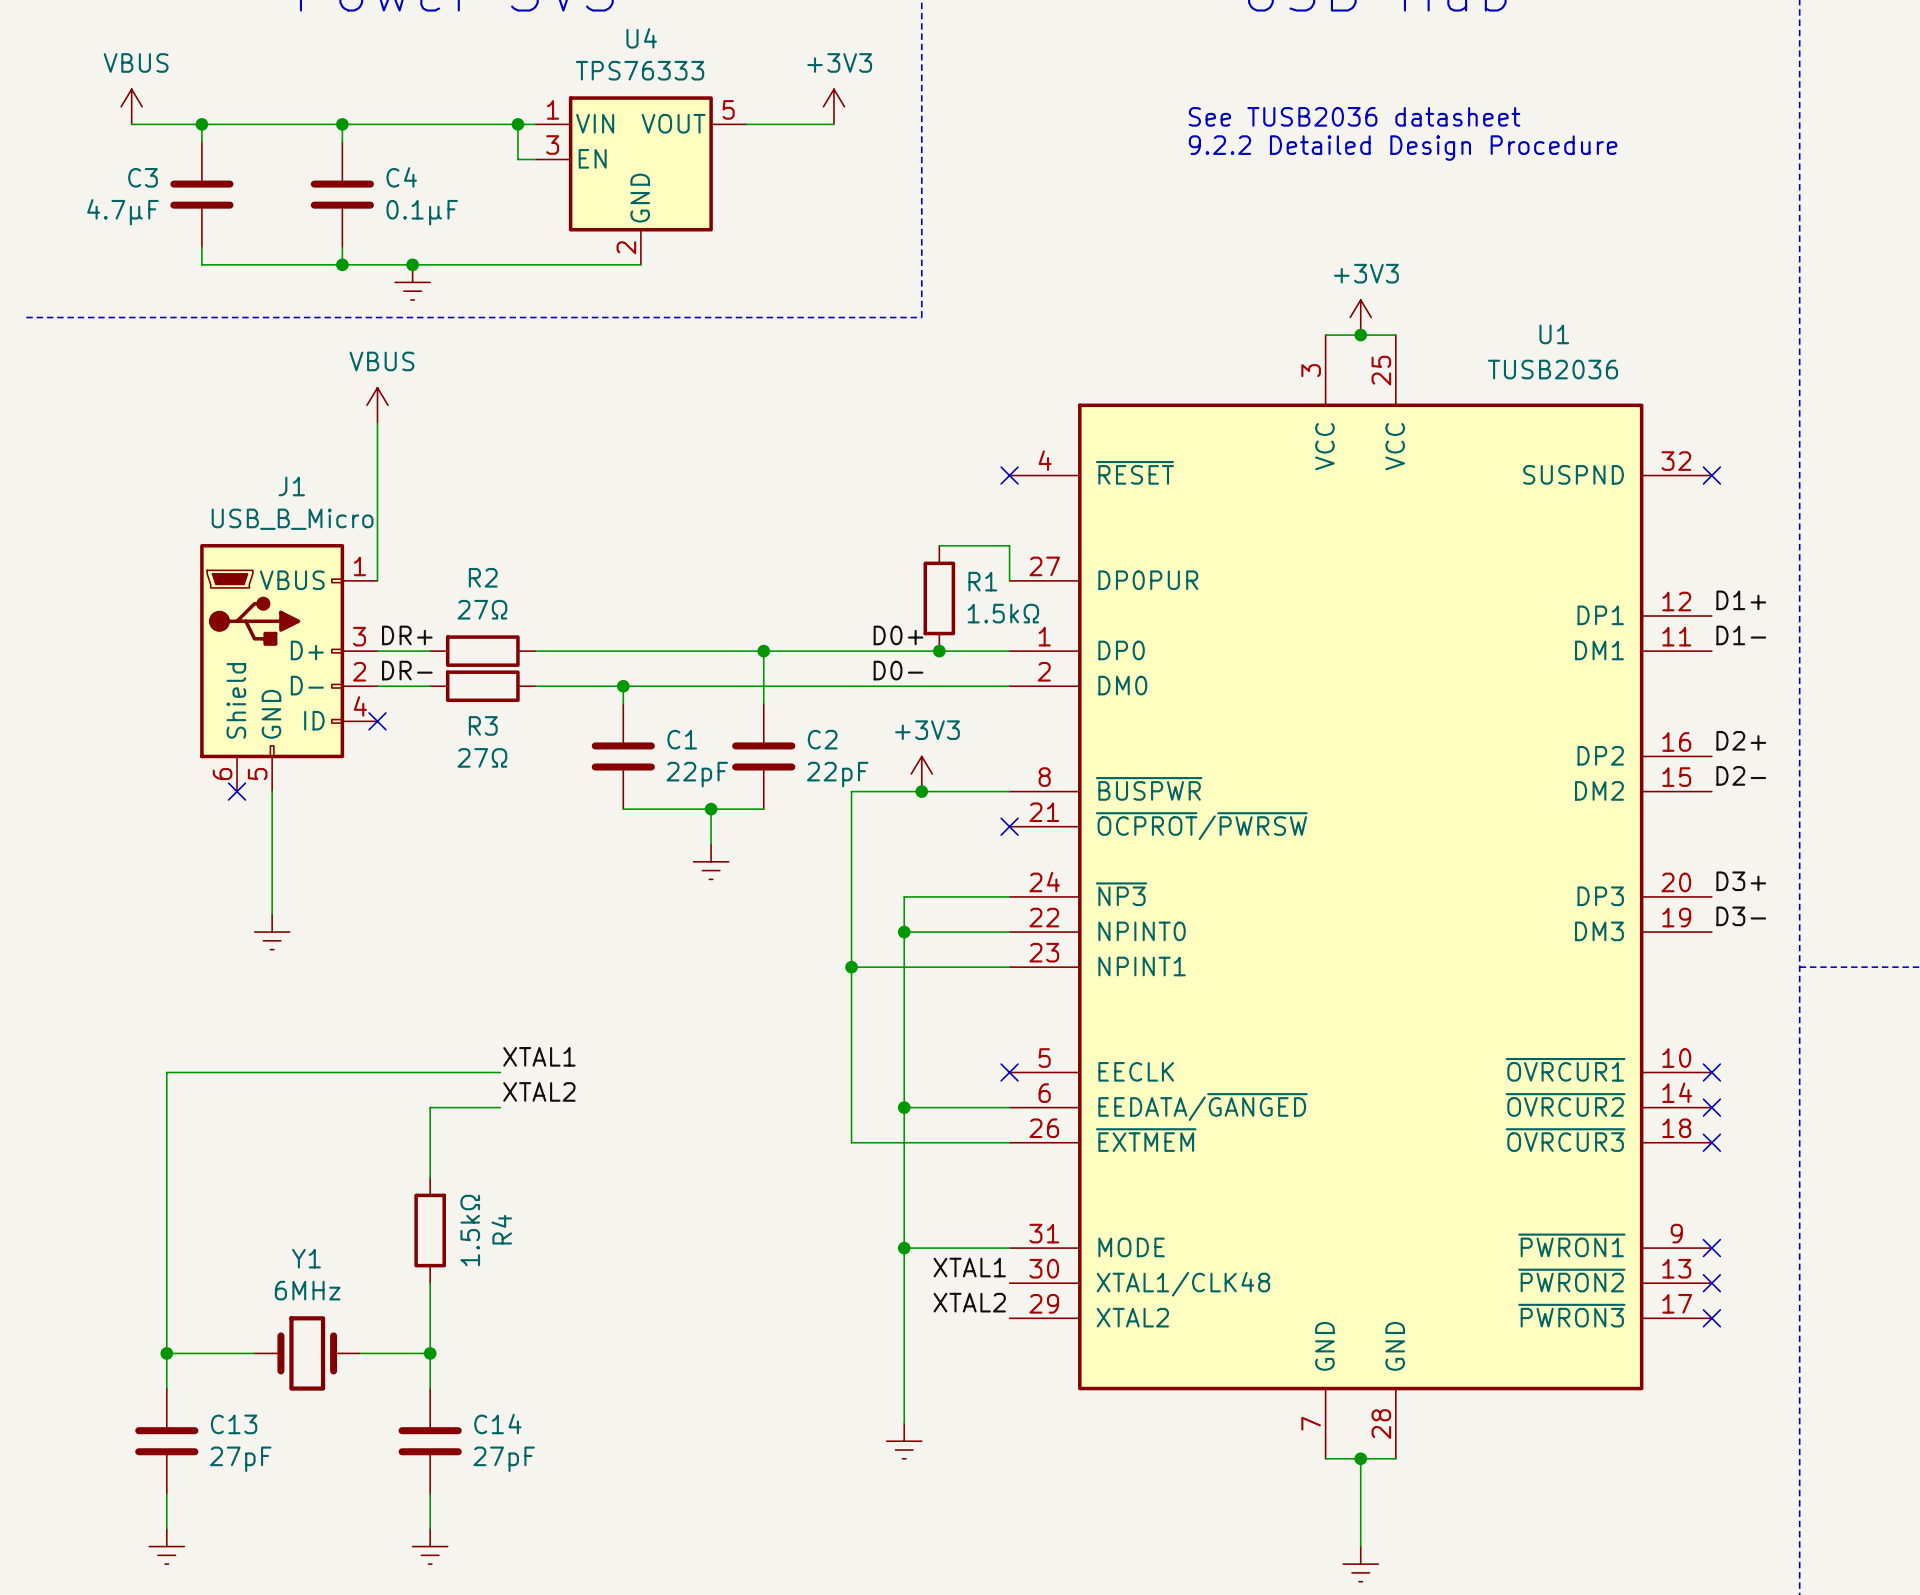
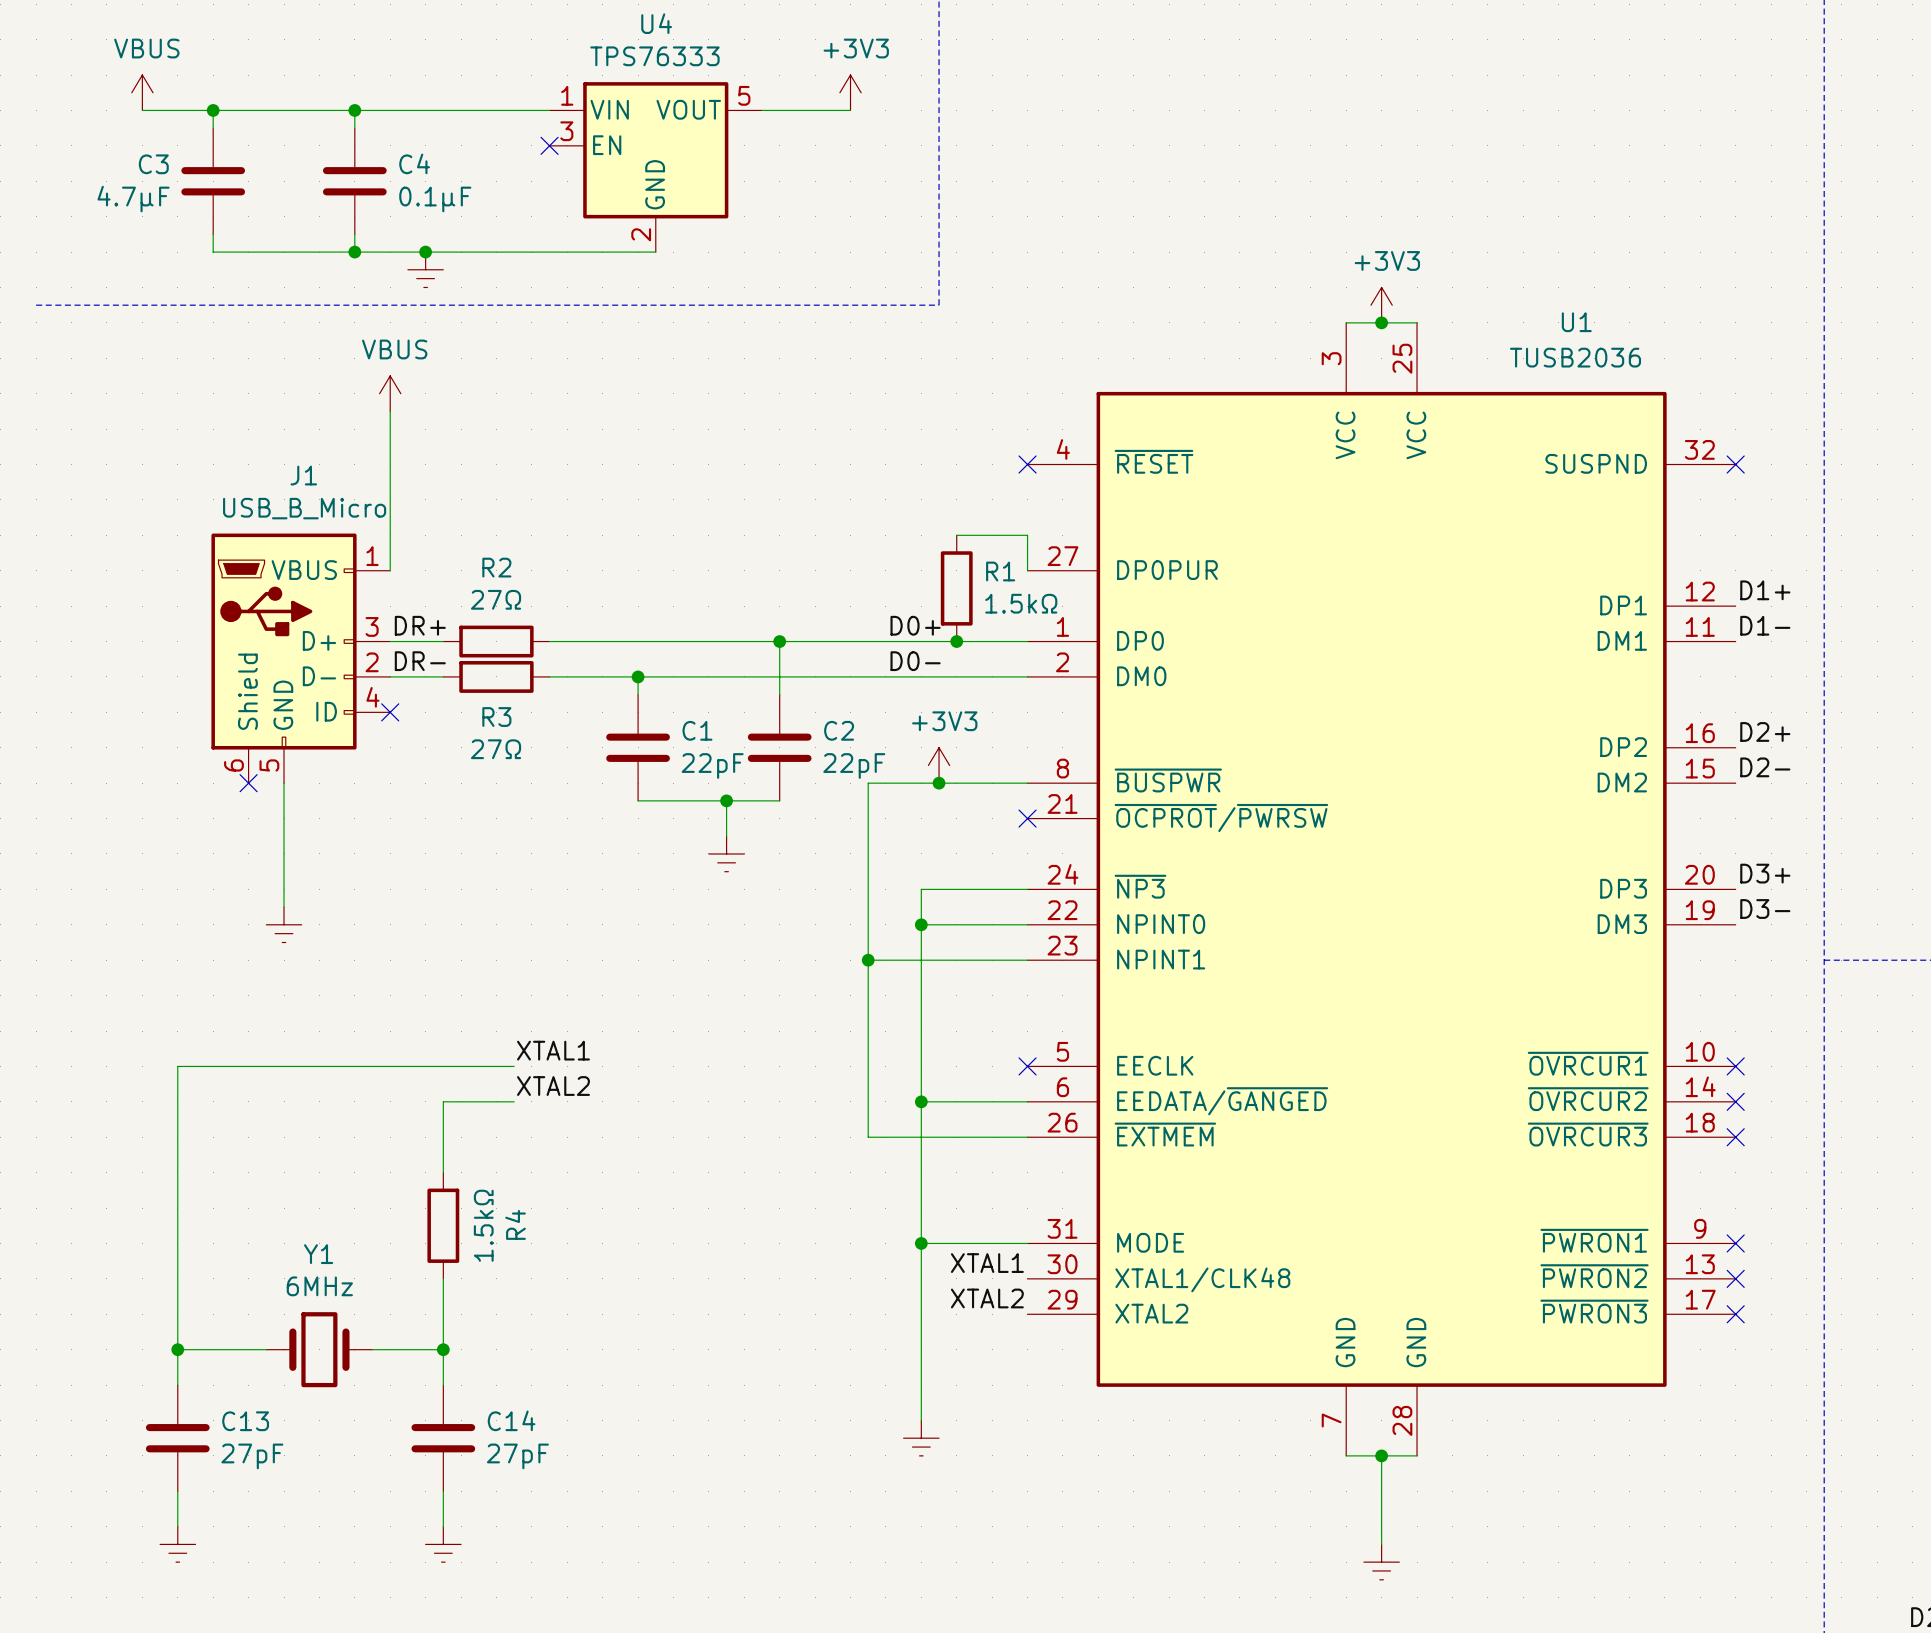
text: See TUSB2036 datasheet (1354, 116) -> none
wire: (517, 124) (517, 159) (535, 159) -> none
junction: (517, 124) -> none
text: 9.2.2 Detailed Design Procedure (1403, 148) -> none
no-connect mark: none -> (549, 145)

